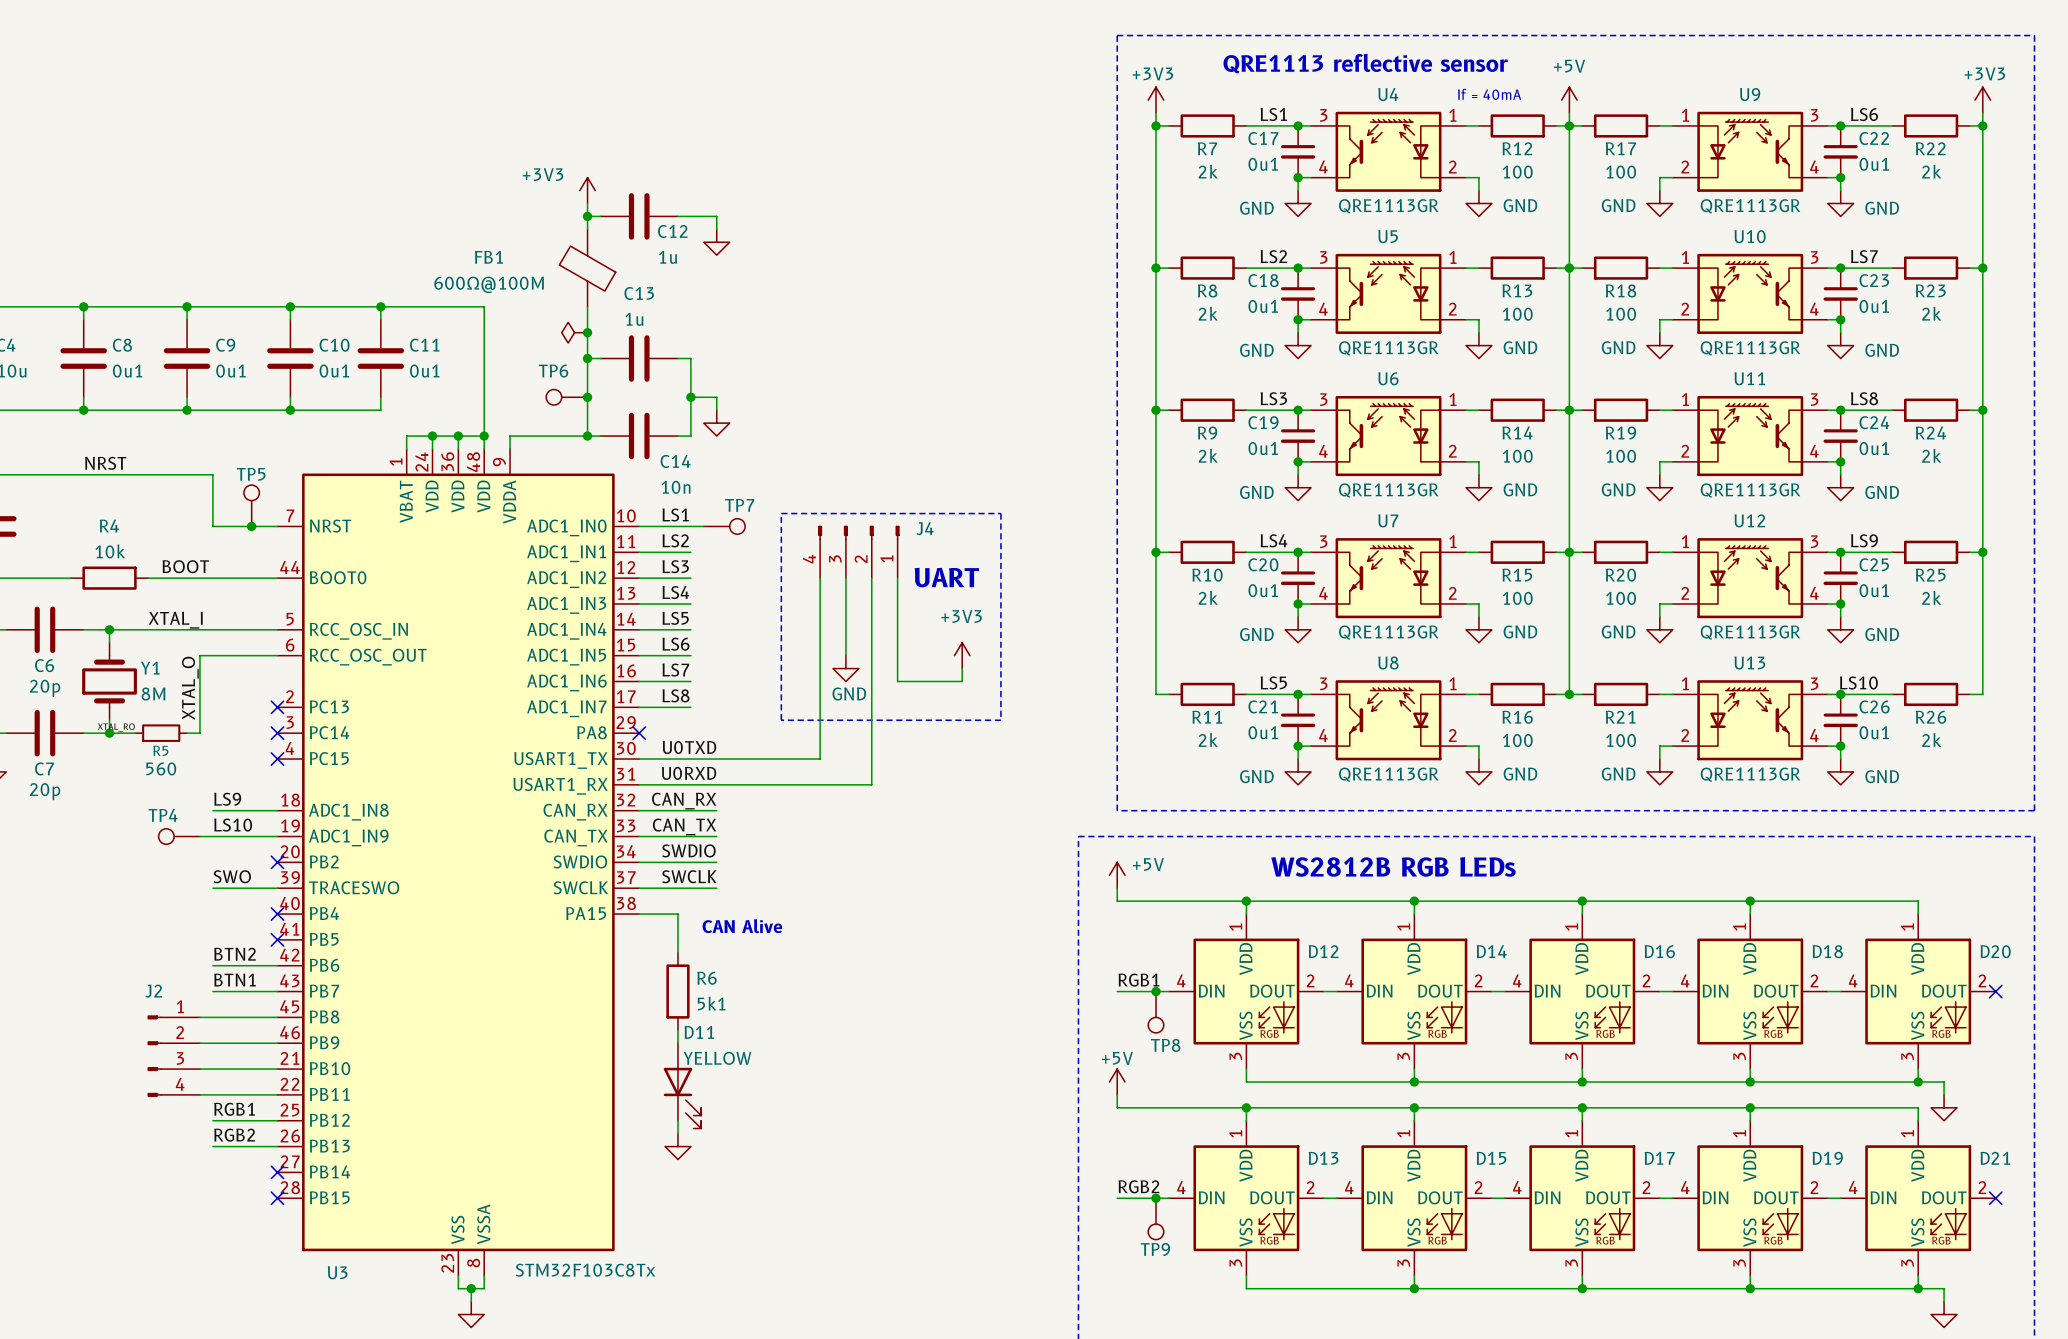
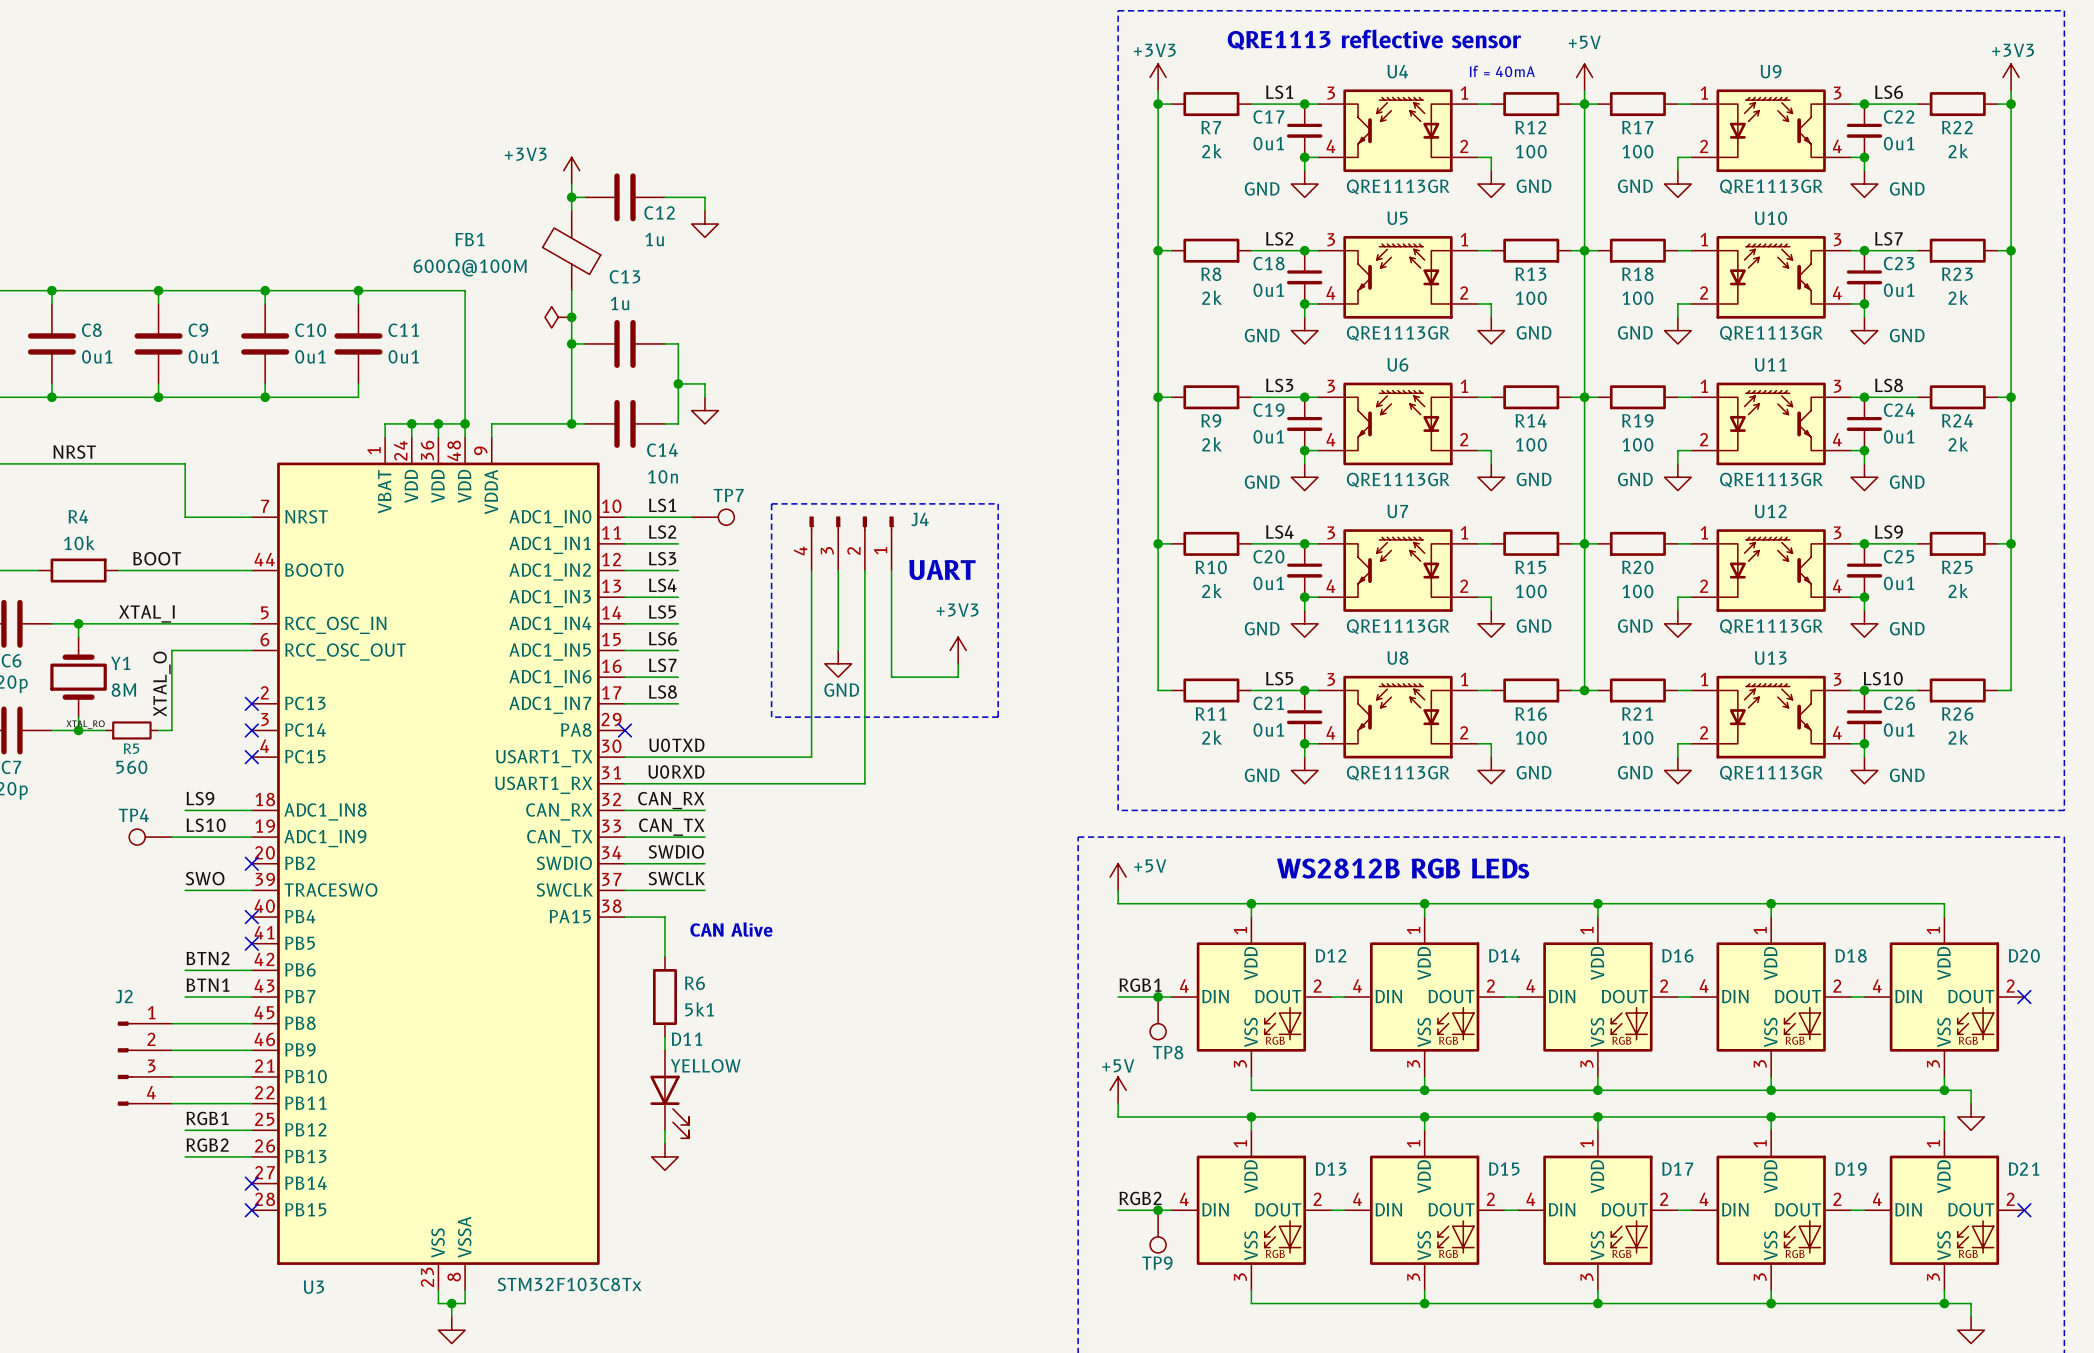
TP6: (566, 397) -> none
junction: (587, 397) -> none
TP5: (251, 505) -> none
junction: (251, 526) -> none

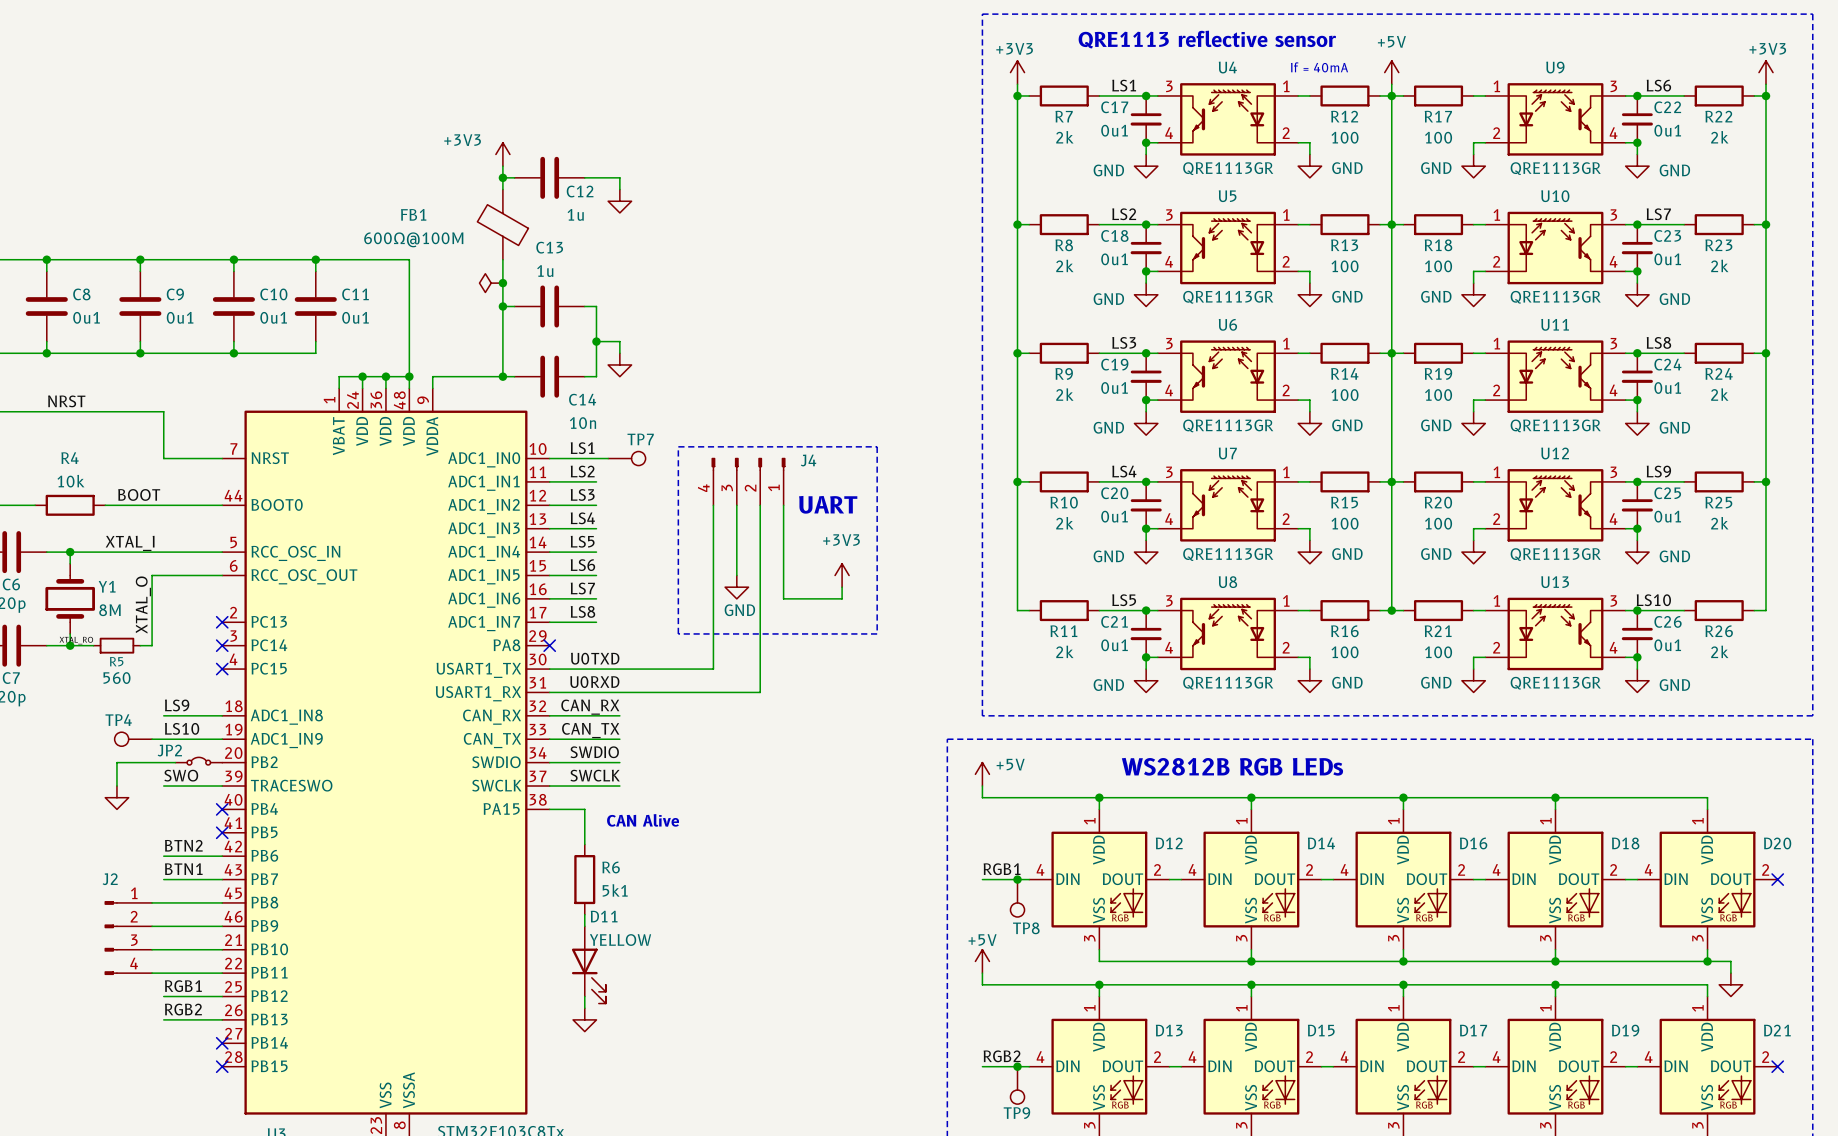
JP2: none -> (198, 761)
wire: none -> (175, 762) (116, 762) (116, 786)
no-connect mark: (251, 863) -> none
power symbol: none -> (116, 797)

